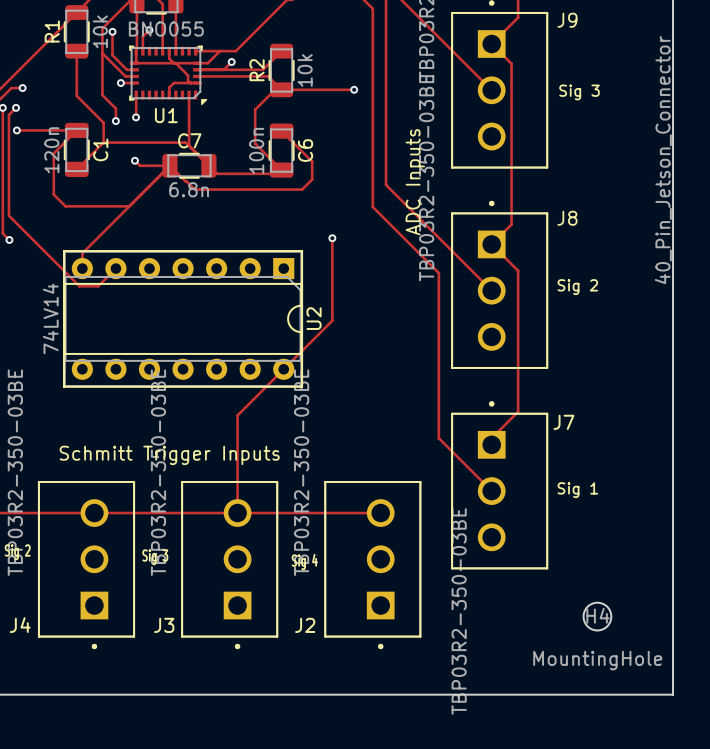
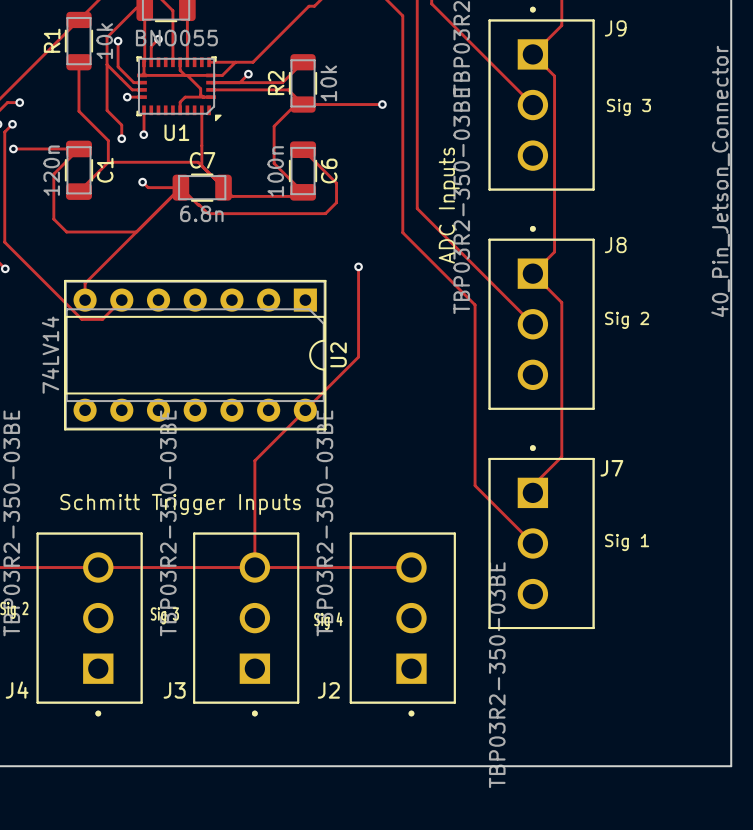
H4: MountingHole (597, 616) -> none

